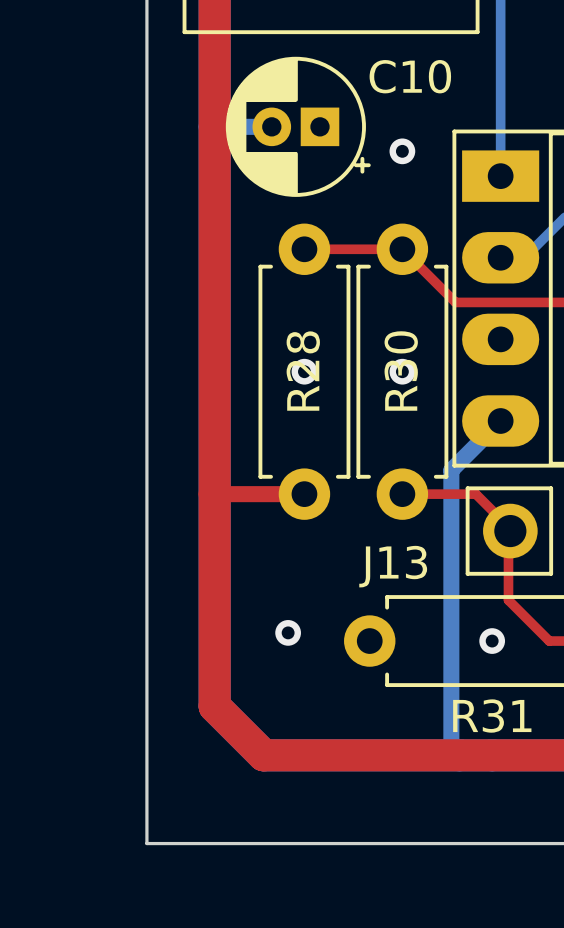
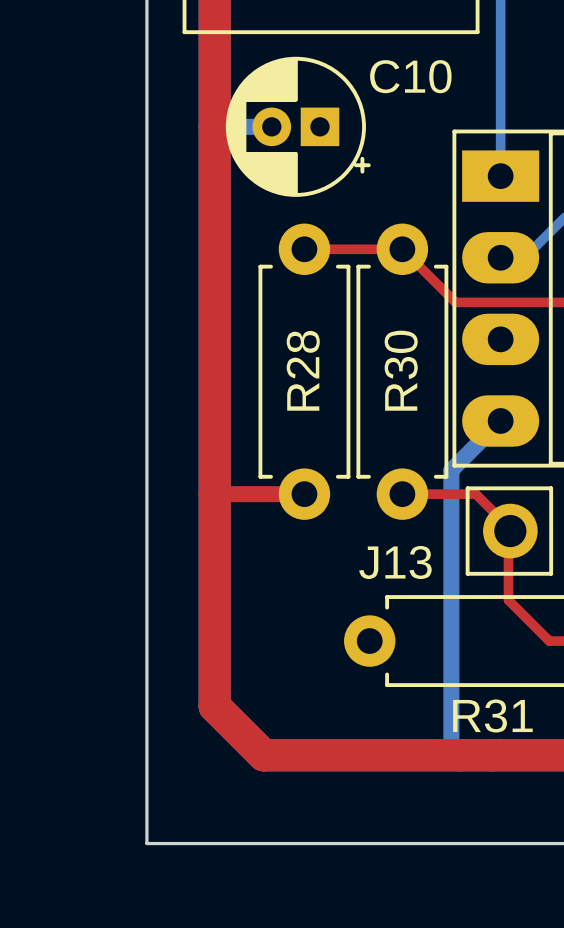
via: (402, 151) -> none
via: (304, 371) -> none
via: (402, 371) -> none
via: (288, 632) -> none
via: (492, 641) -> none

